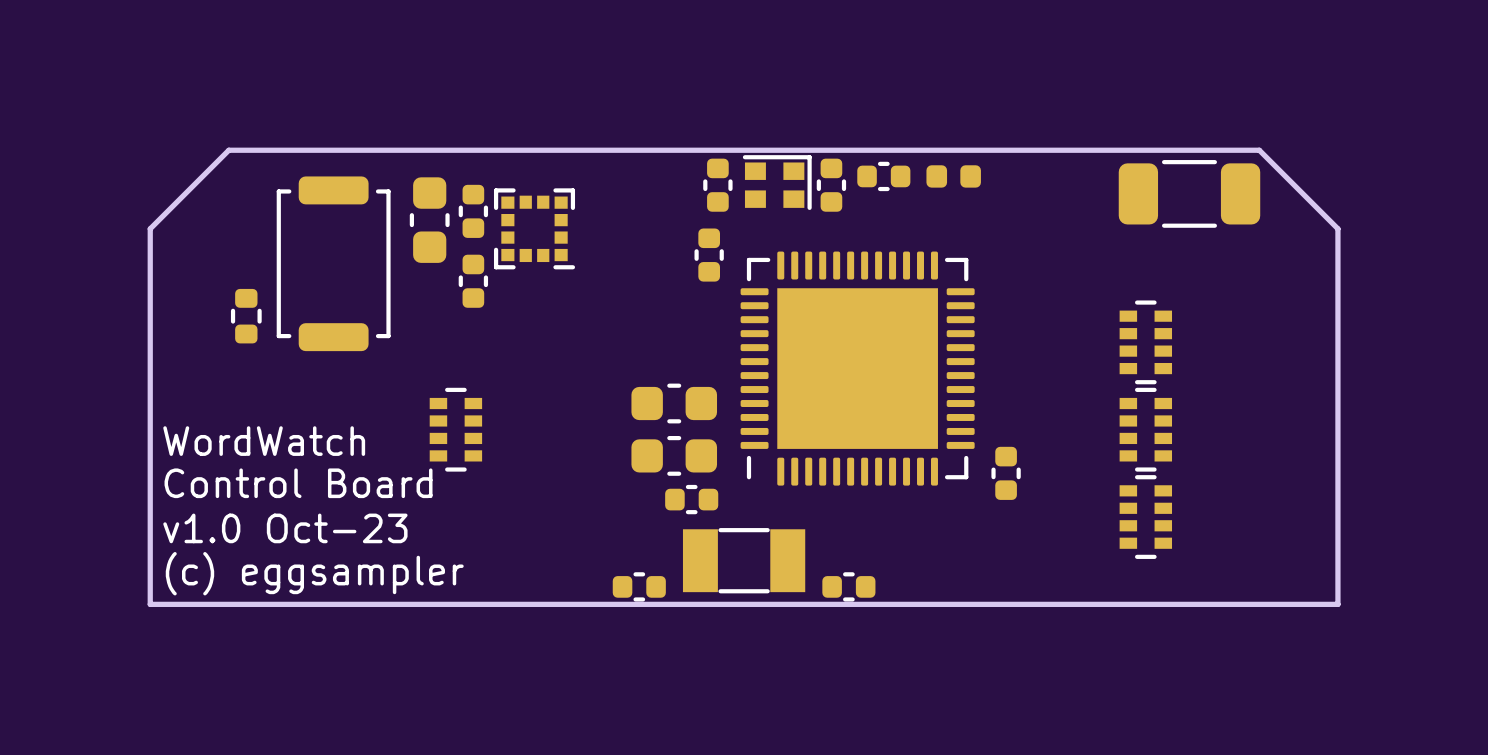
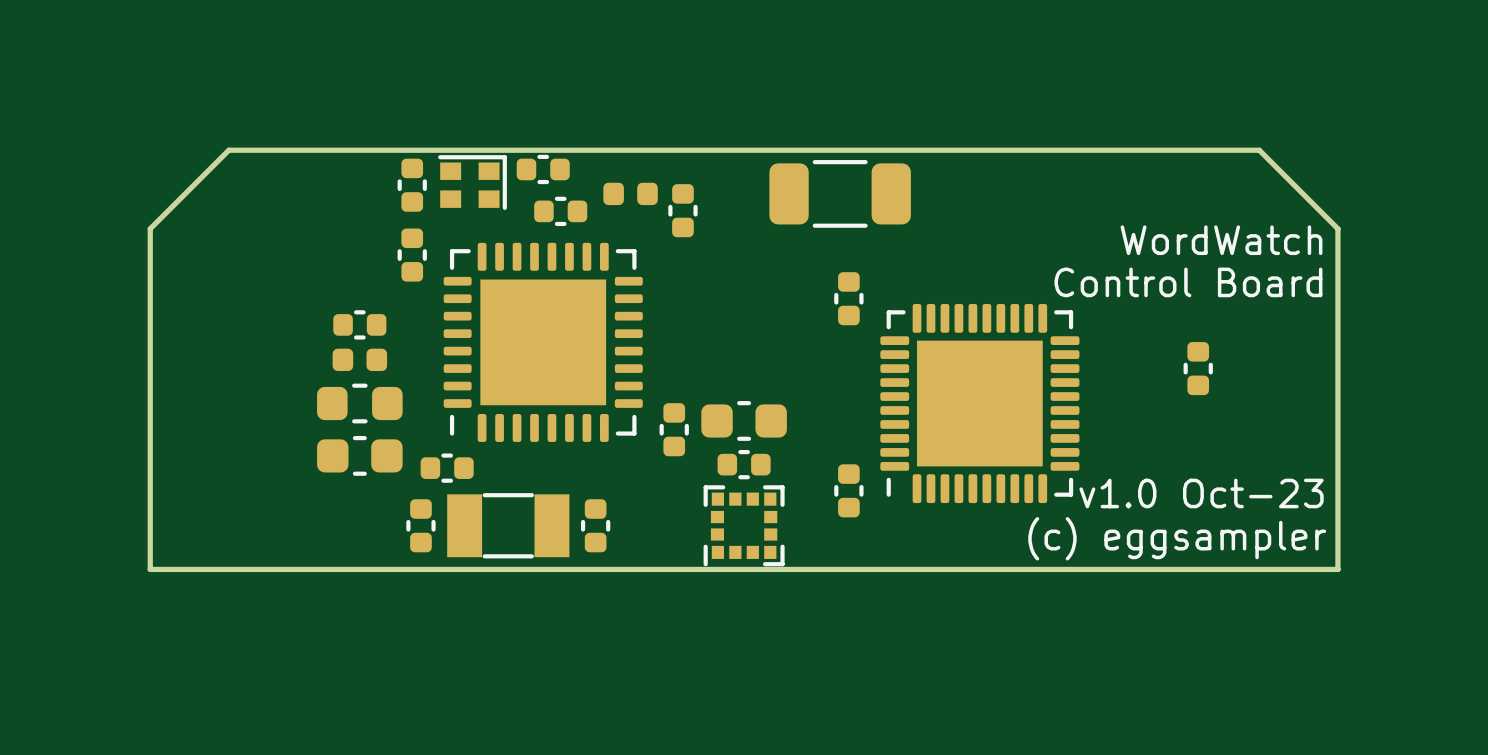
part footprint: [816, 158, 847, 212] -> [769, 160, 911, 228]
part: none -> (543, 169)
part: (883, 176) -> none
part: (953, 176) -> none
part position: (777, 182) -> (472, 182)
part: none -> (412, 185)
part: (717, 185) -> none
part: none -> (630, 193)
part: (1189, 193) -> none
part: none -> (682, 210)
part: (473, 211) -> none
part: none -> (560, 211)
part: (429, 220) -> none
part rotation: 0° (534, 228) -> 90° clockwise (744, 525)
part position: (534, 228) -> (744, 525)
text: none -> WordWatch (1221, 240)
part: none -> (412, 255)
part: (709, 255) -> none
part: (333, 263) -> none
part: (473, 281) -> none
text: none -> Control Board (1188, 282)
part: none -> (848, 298)
part: (246, 316) -> none
part: none -> (359, 324)
part: none -> (543, 342)
part: (1145, 342) -> none
part: none -> (359, 359)
part: (857, 368) -> none
part: none -> (1198, 368)
part: none -> (359, 403)
part: (674, 403) -> none
part: none -> (979, 403)
part: none -> (744, 420)
part: (455, 429) -> none
part: none -> (674, 429)
part: (1145, 429) -> none
text: WordWatch (264, 441) -> none
part: none -> (359, 455)
part: (674, 455) -> none
part: none -> (744, 464)
part: none -> (447, 468)
part: (1006, 473) -> none
text: Control Board (298, 483) -> none
part: none -> (848, 490)
text: none -> v1.0 Oct-23 (1201, 493)
part: (691, 499) -> none
part: (1145, 517) -> none
part: none -> (420, 525)
part: none -> (595, 525)
text: v1.0 Oct-23 (285, 528) -> none
text: none -> (c) eggsampler (1177, 538)
part position: (744, 560) -> (508, 525)
board edge: (150, 569) (150, 604) (1337, 604) (1337, 569) -> (150, 569) (1337, 569)
text: (c) eggsampler (314, 573) -> none
part: (639, 586) -> none
part: (848, 586) -> none

